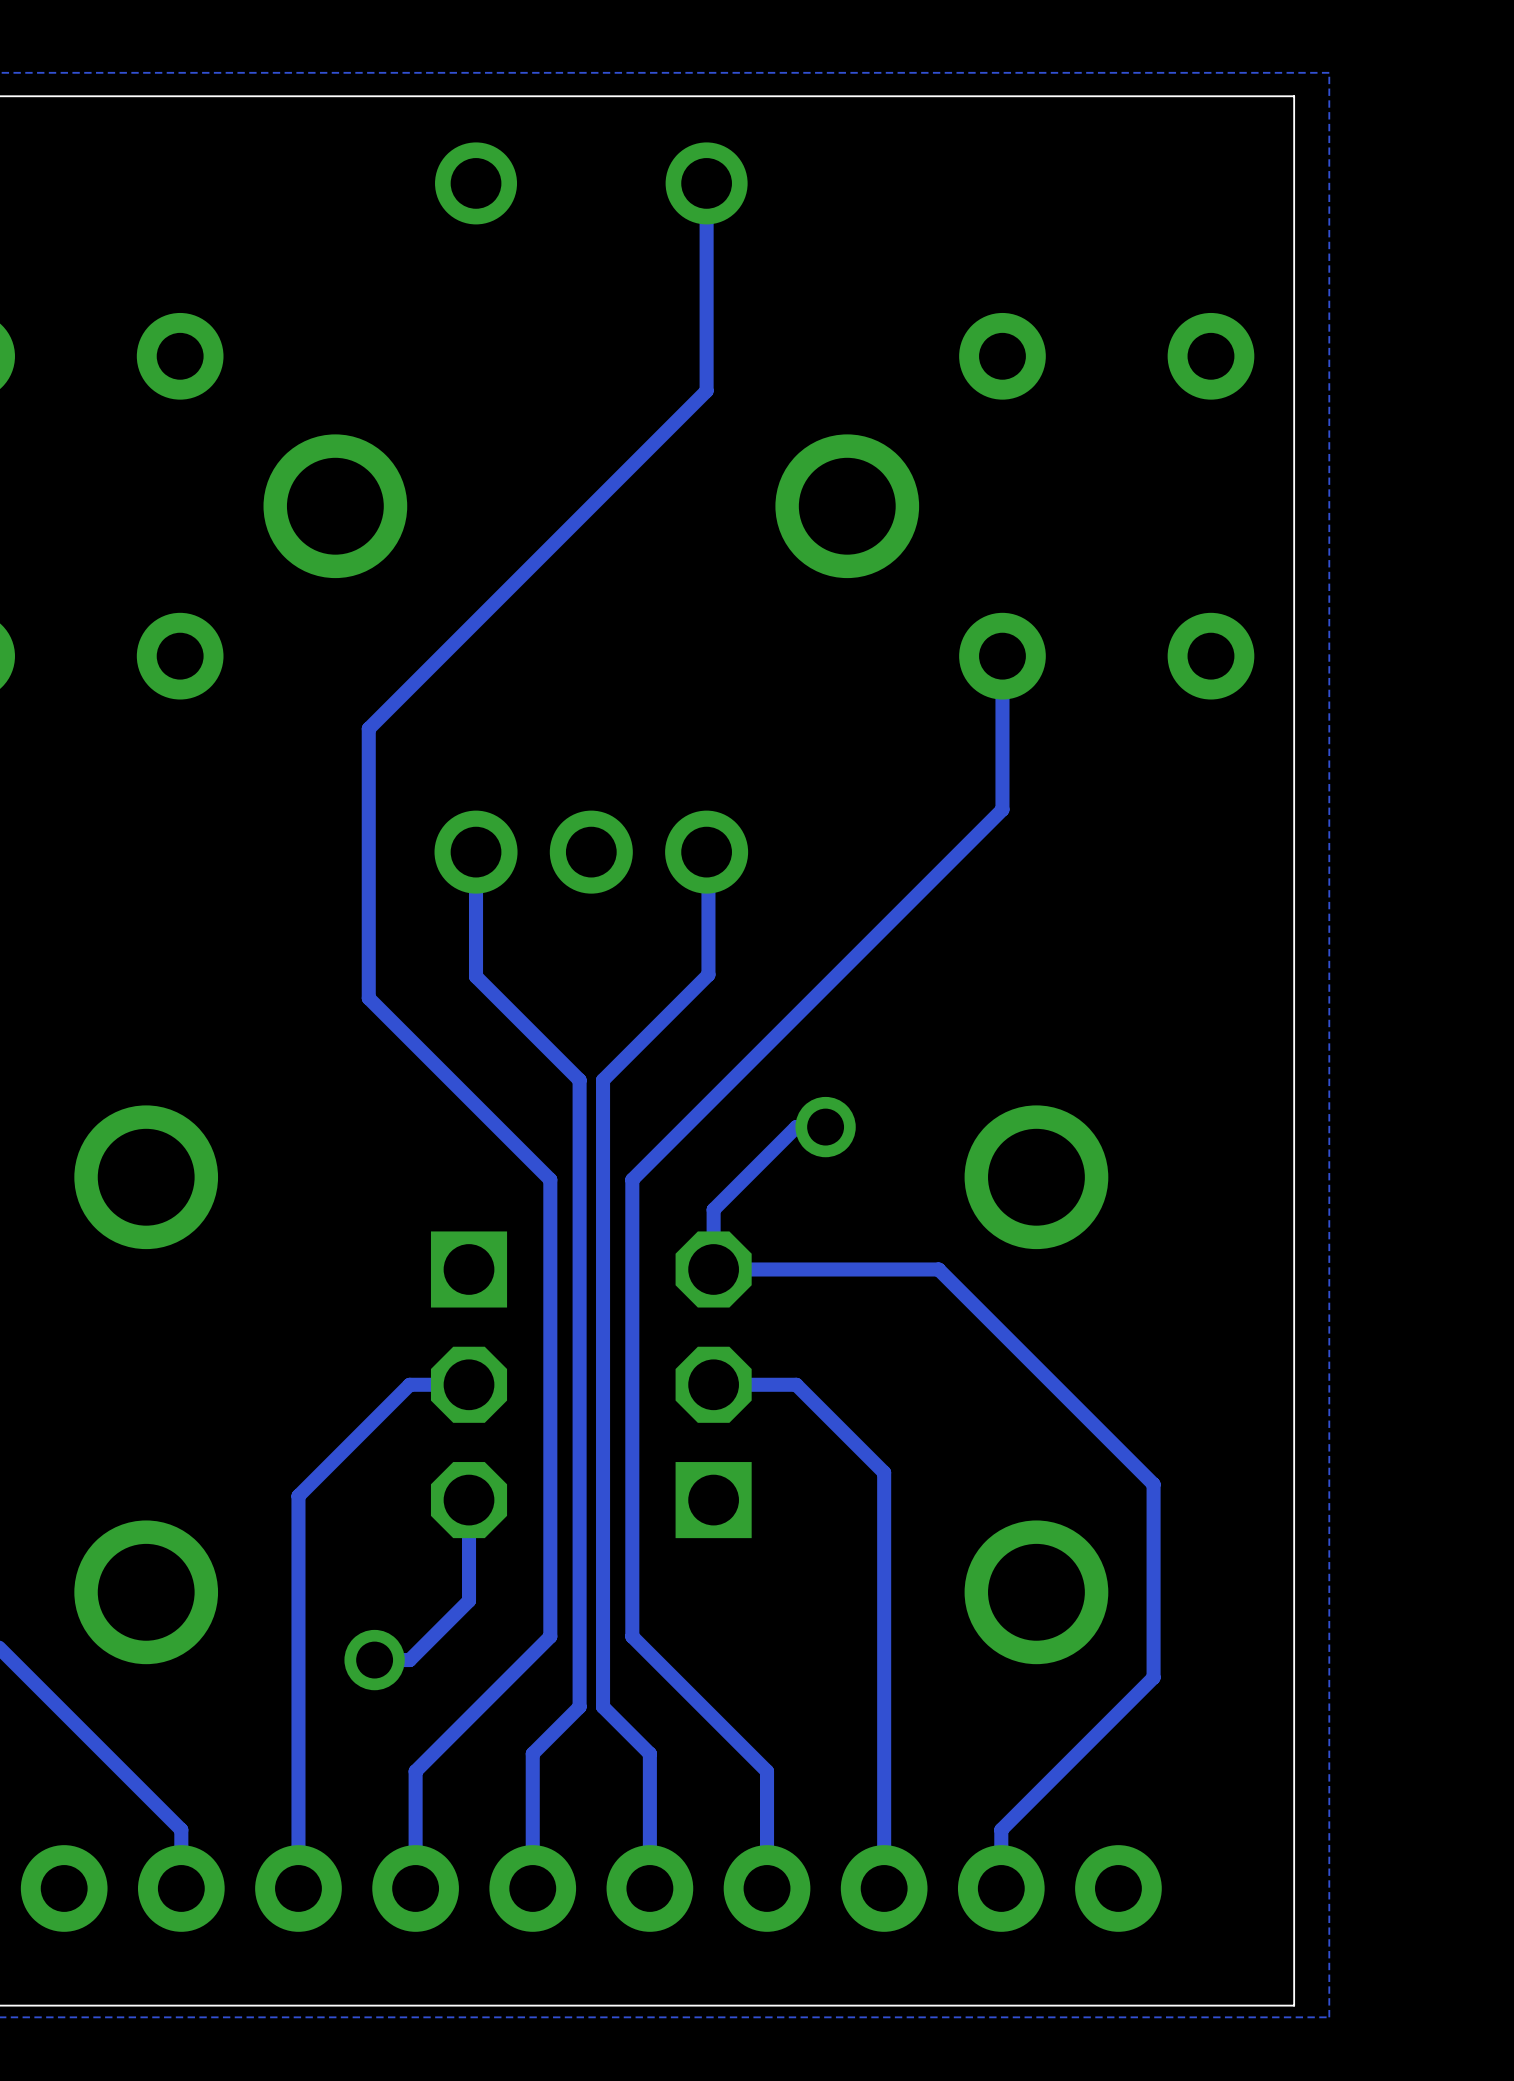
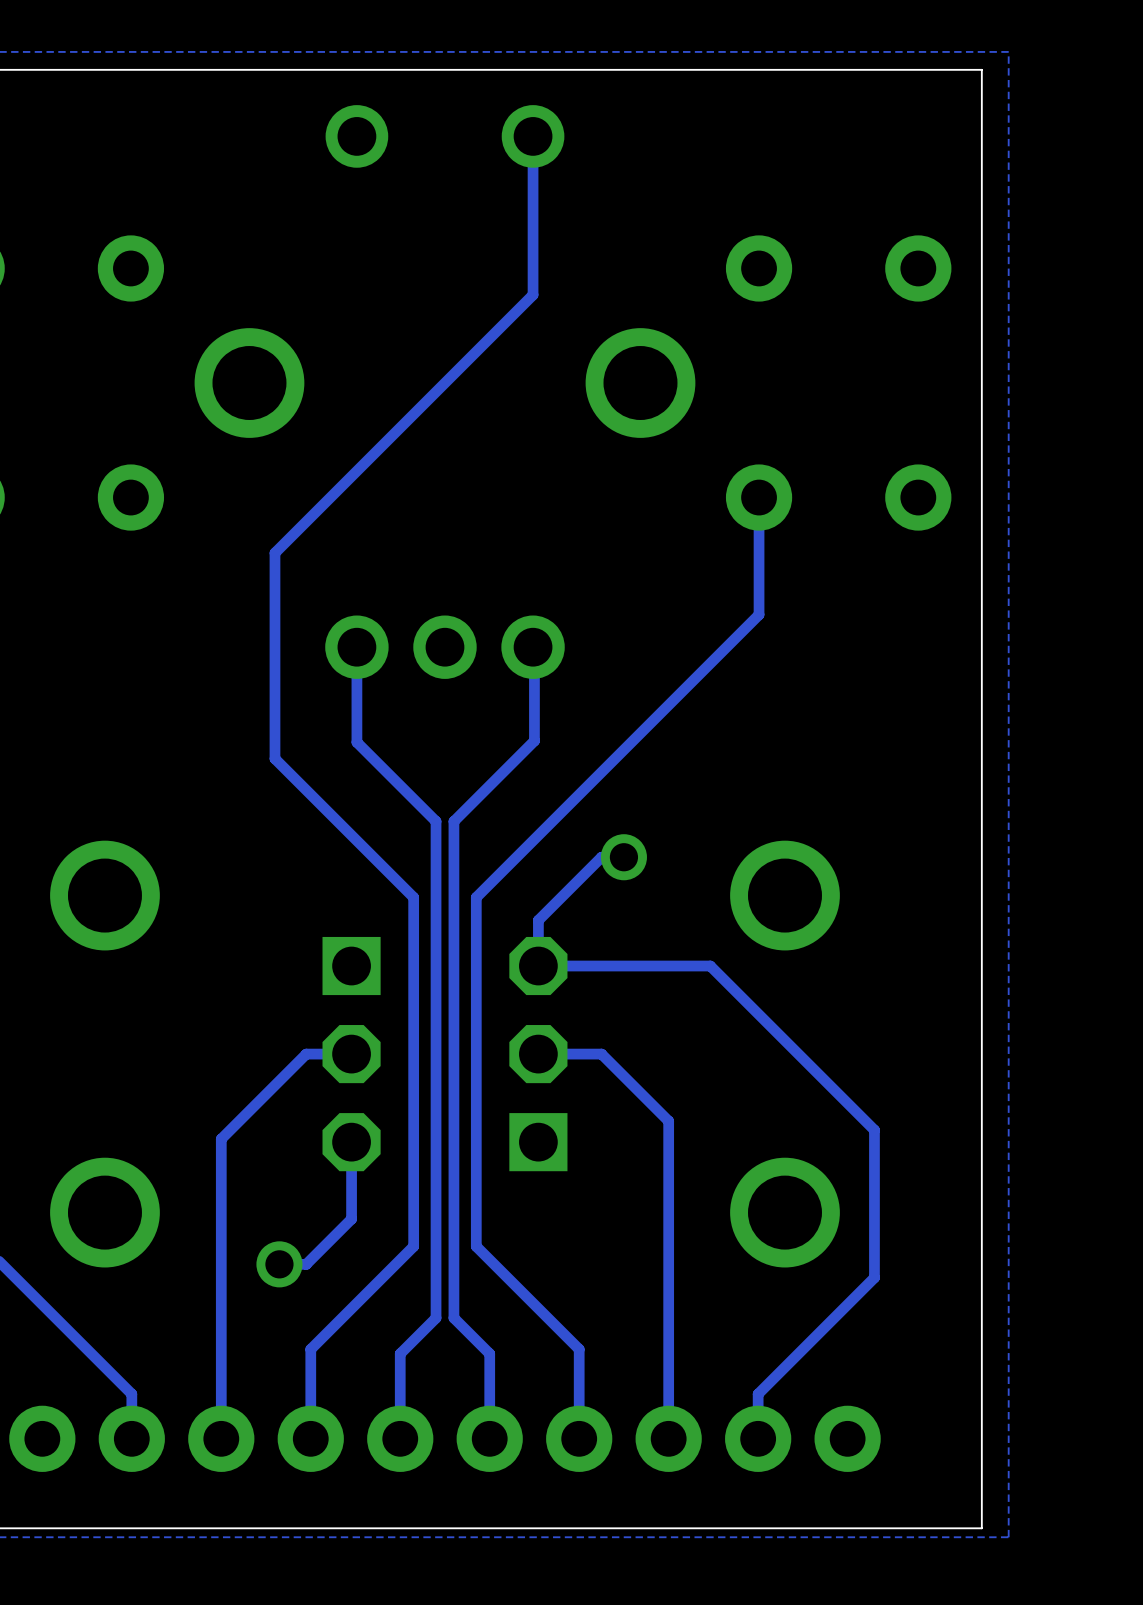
track: (579, 1706) (532, 1753) (532, 1777) -> (436, 1300) (436, 1318) (400, 1353)
track: (603, 1706) (649, 1753) (649, 1777) -> (453, 1300) (453, 1318) (489, 1353)

